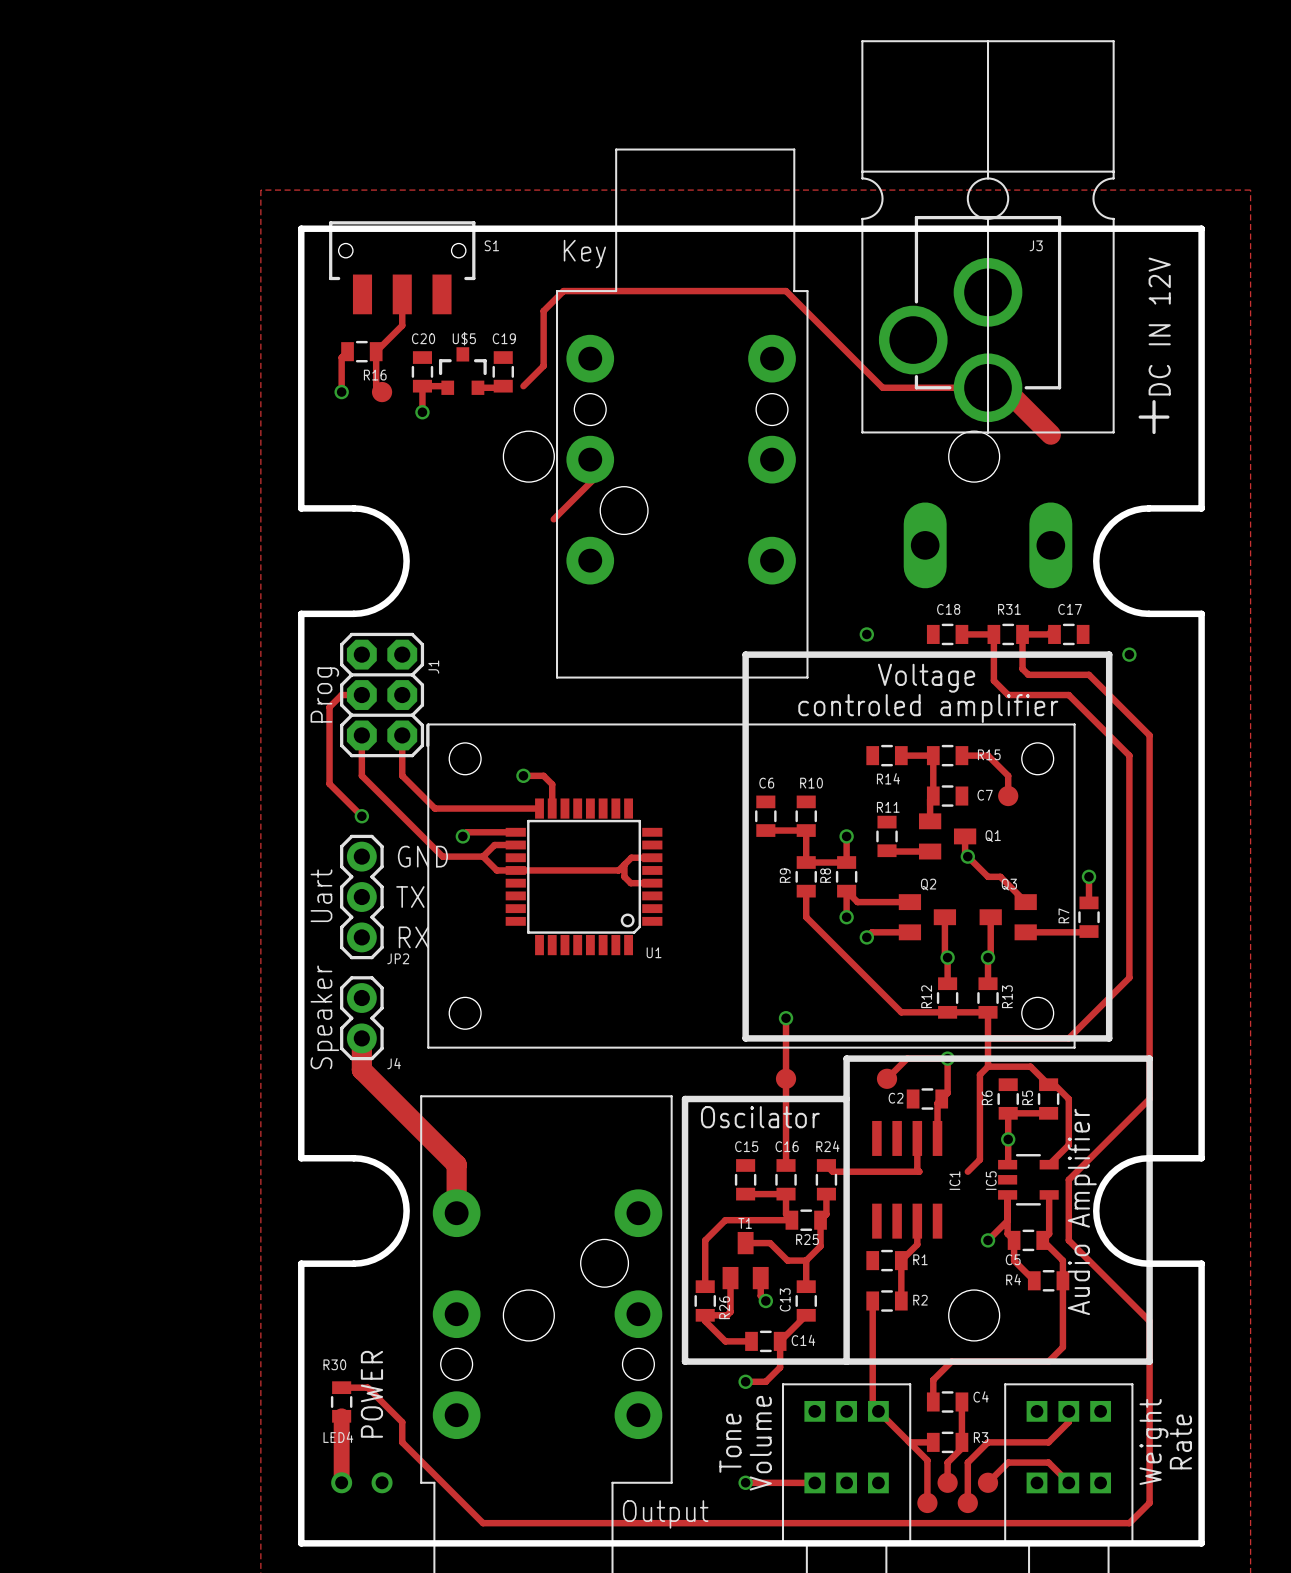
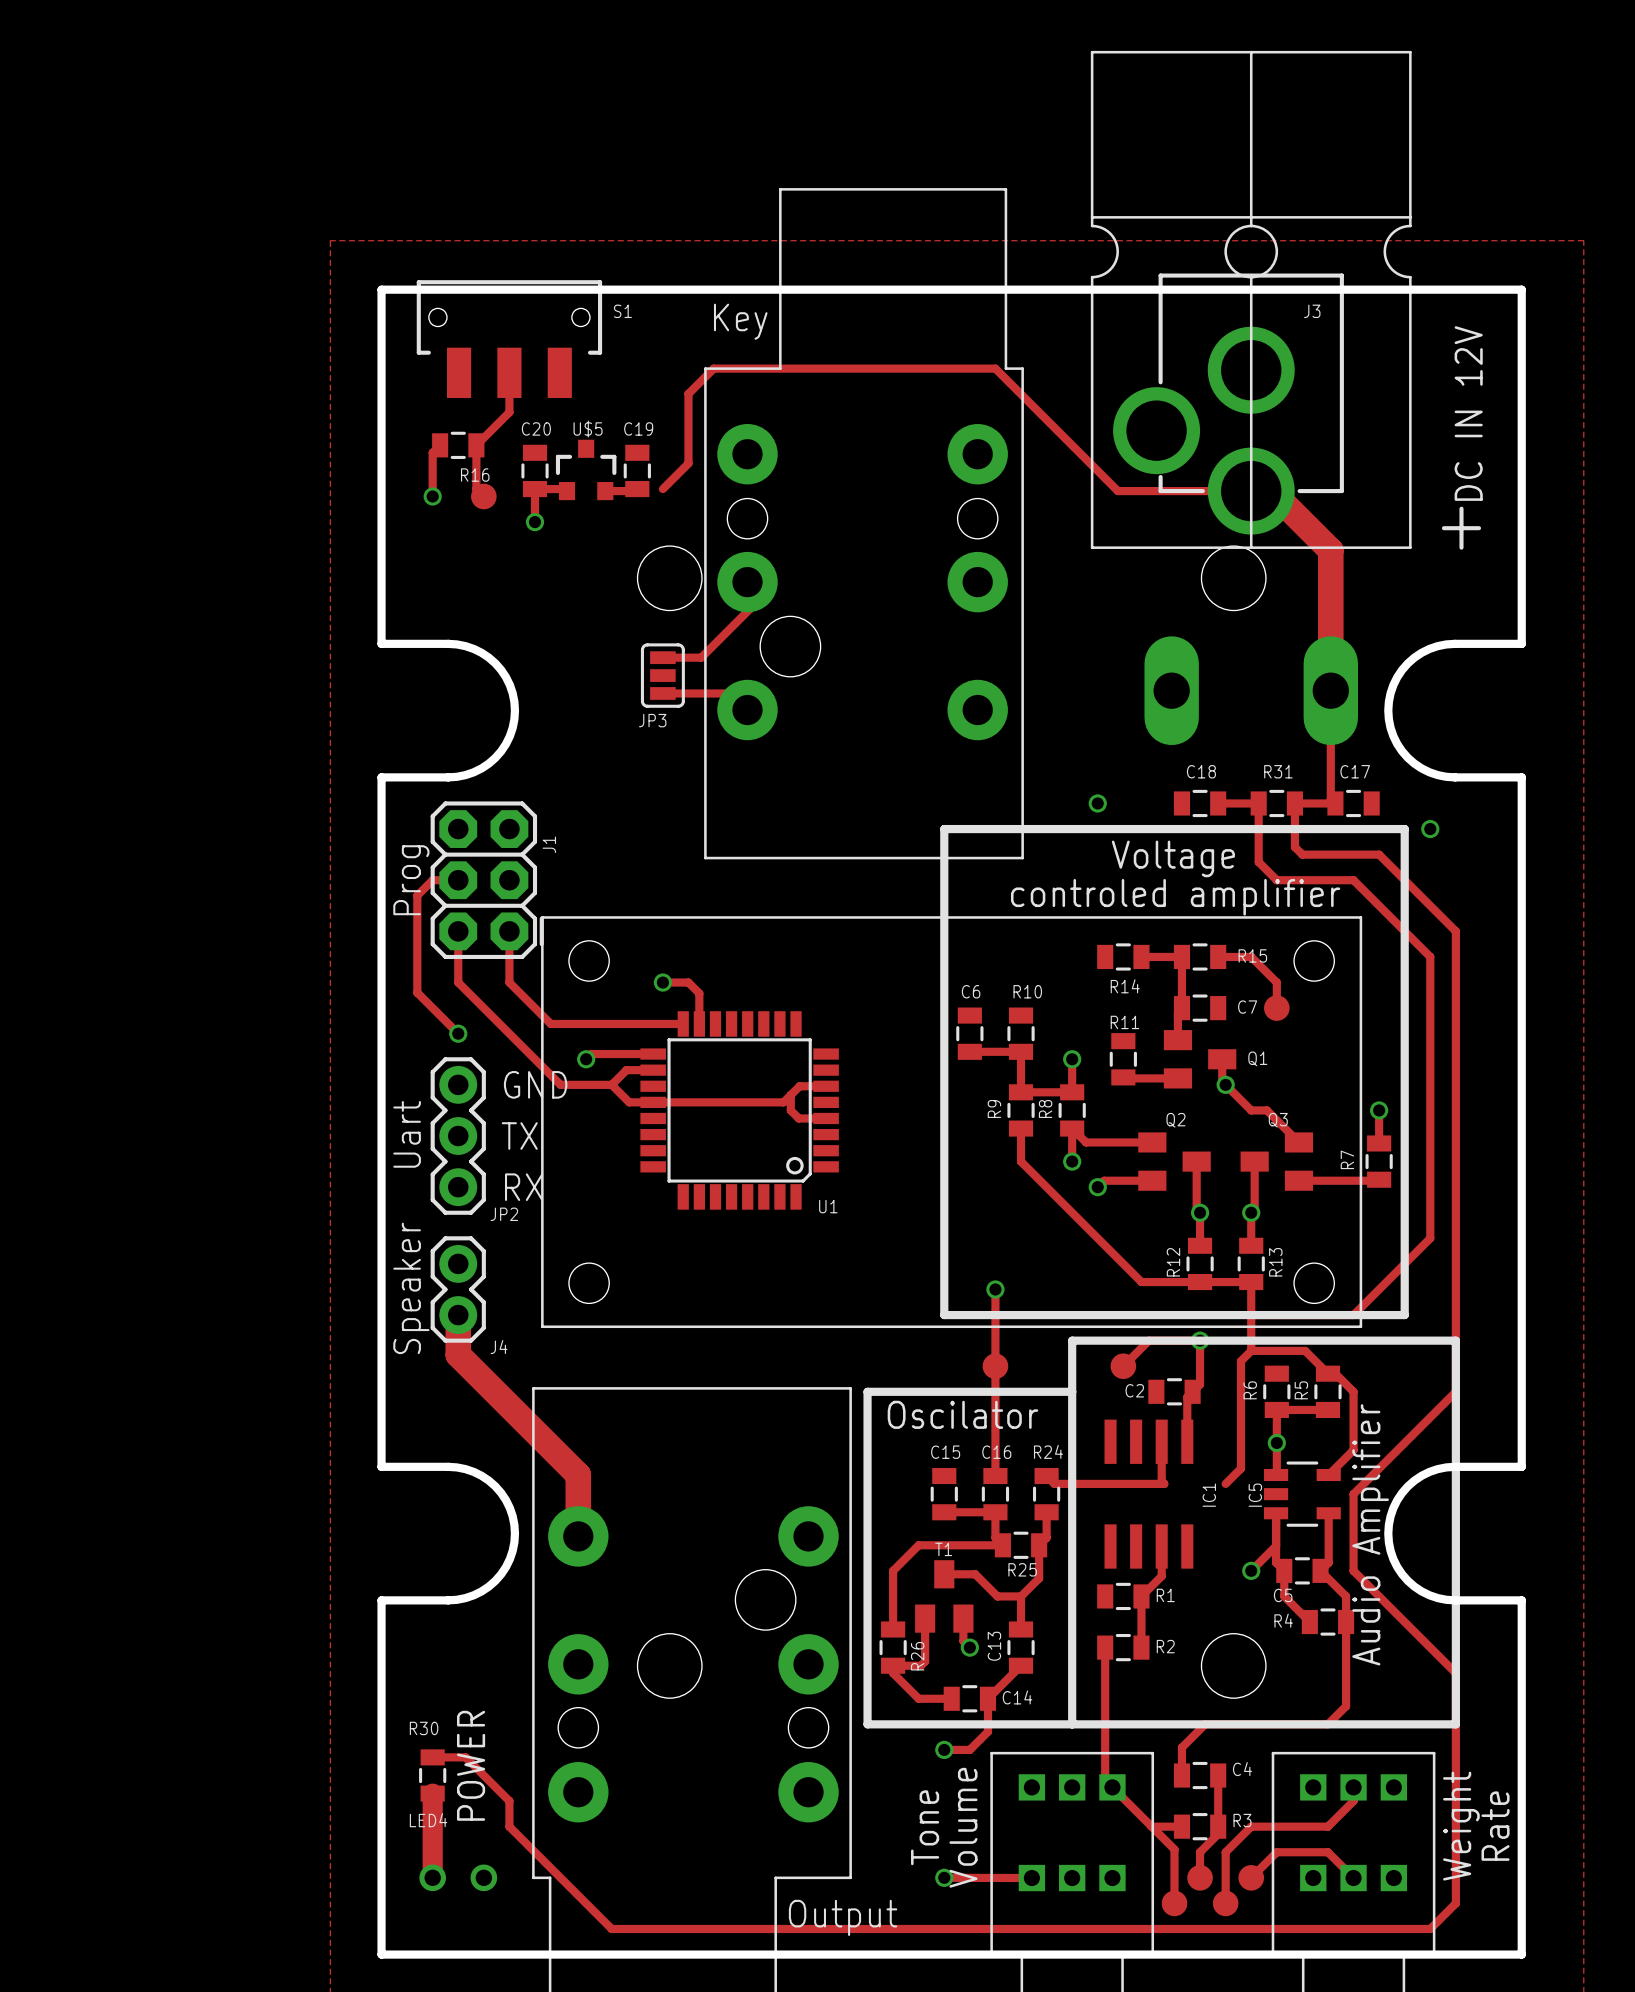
track: none -> (1330, 550) (1330, 798)
track: none -> (662, 657) (701, 657)
JP3: none -> (662, 675)
track: none -> (662, 693) (730, 693)

